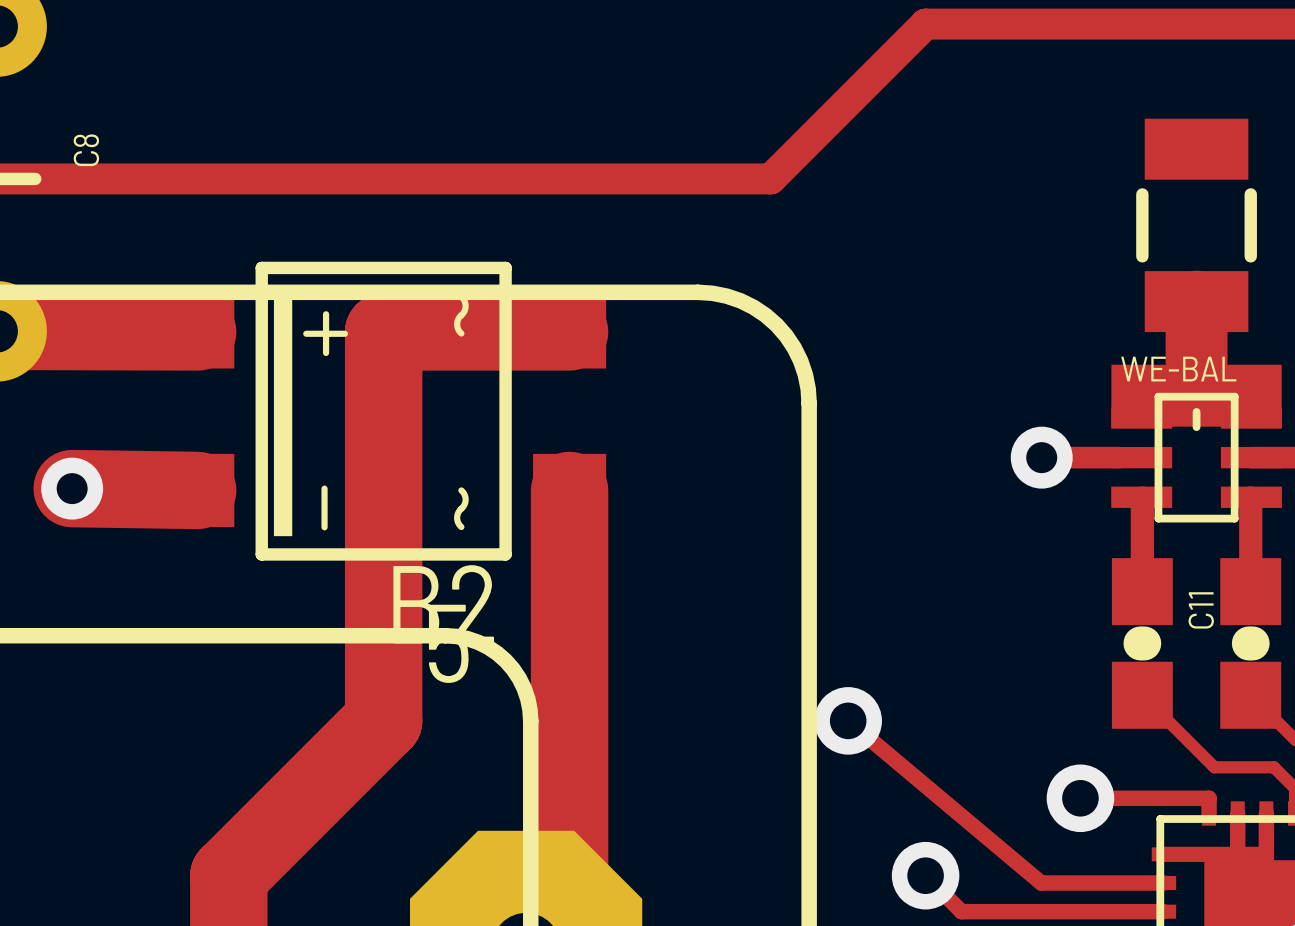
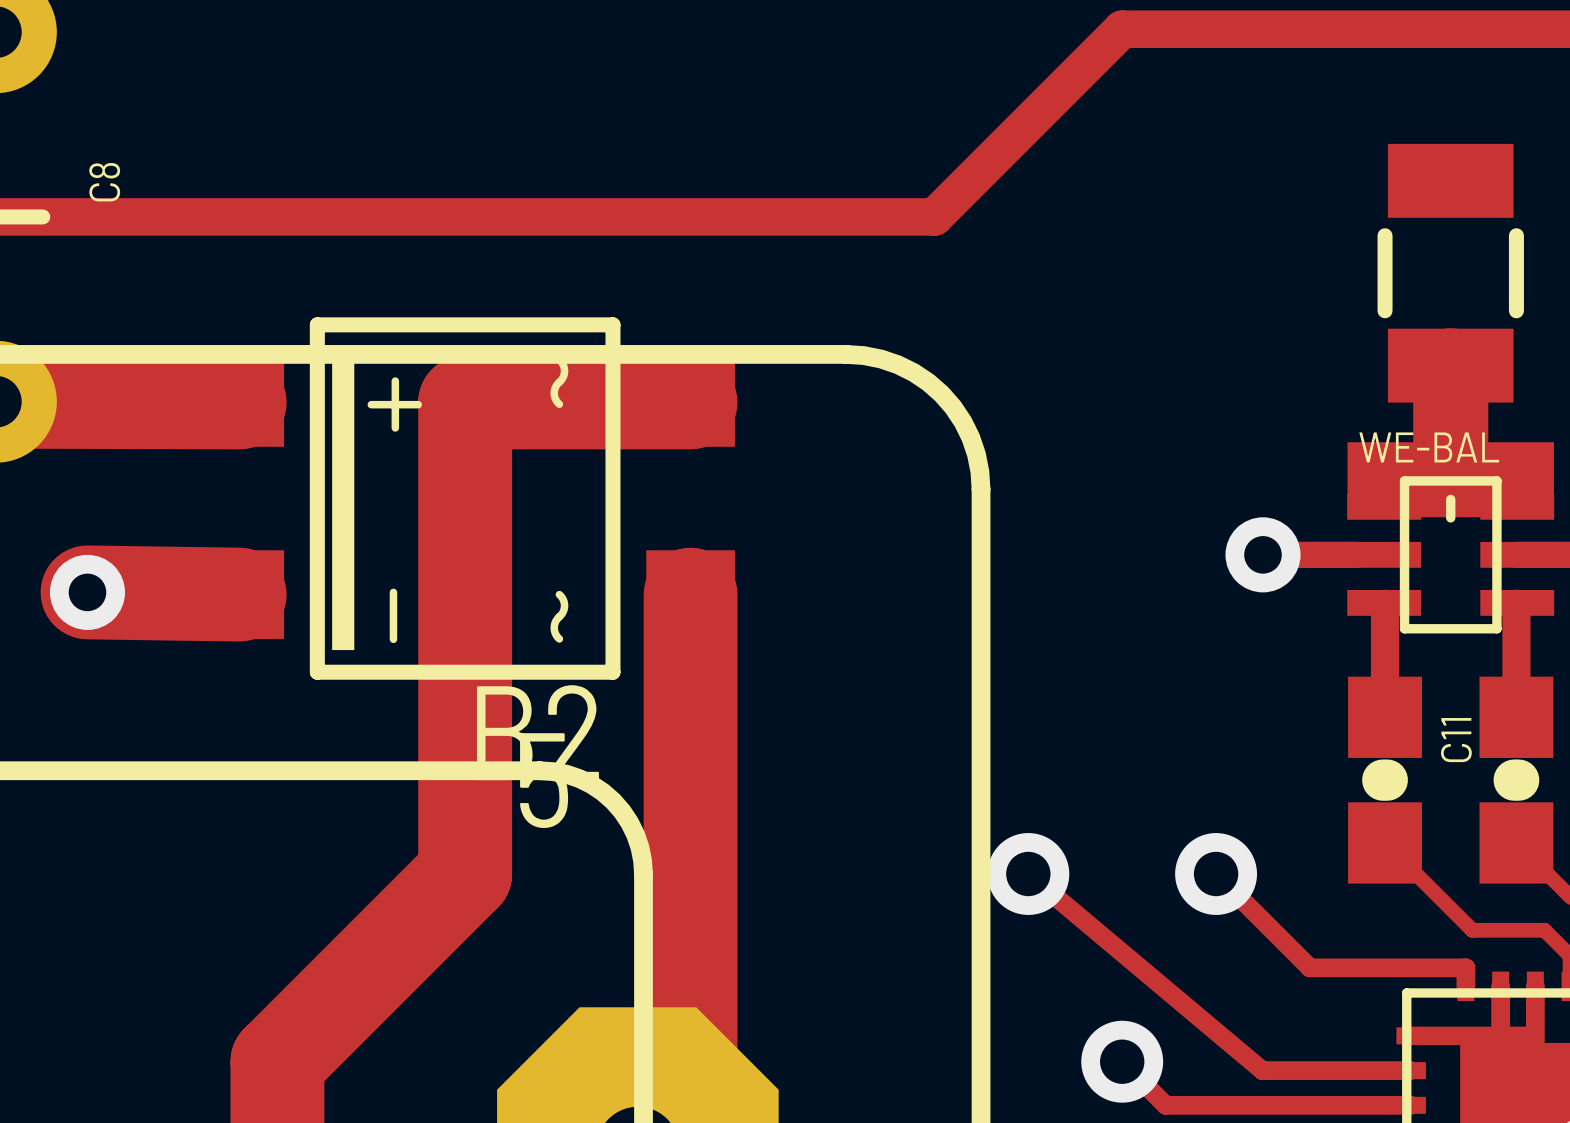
track: none -> (1216, 873) (1309, 967)
via position: (1080, 798) -> (1216, 873)

